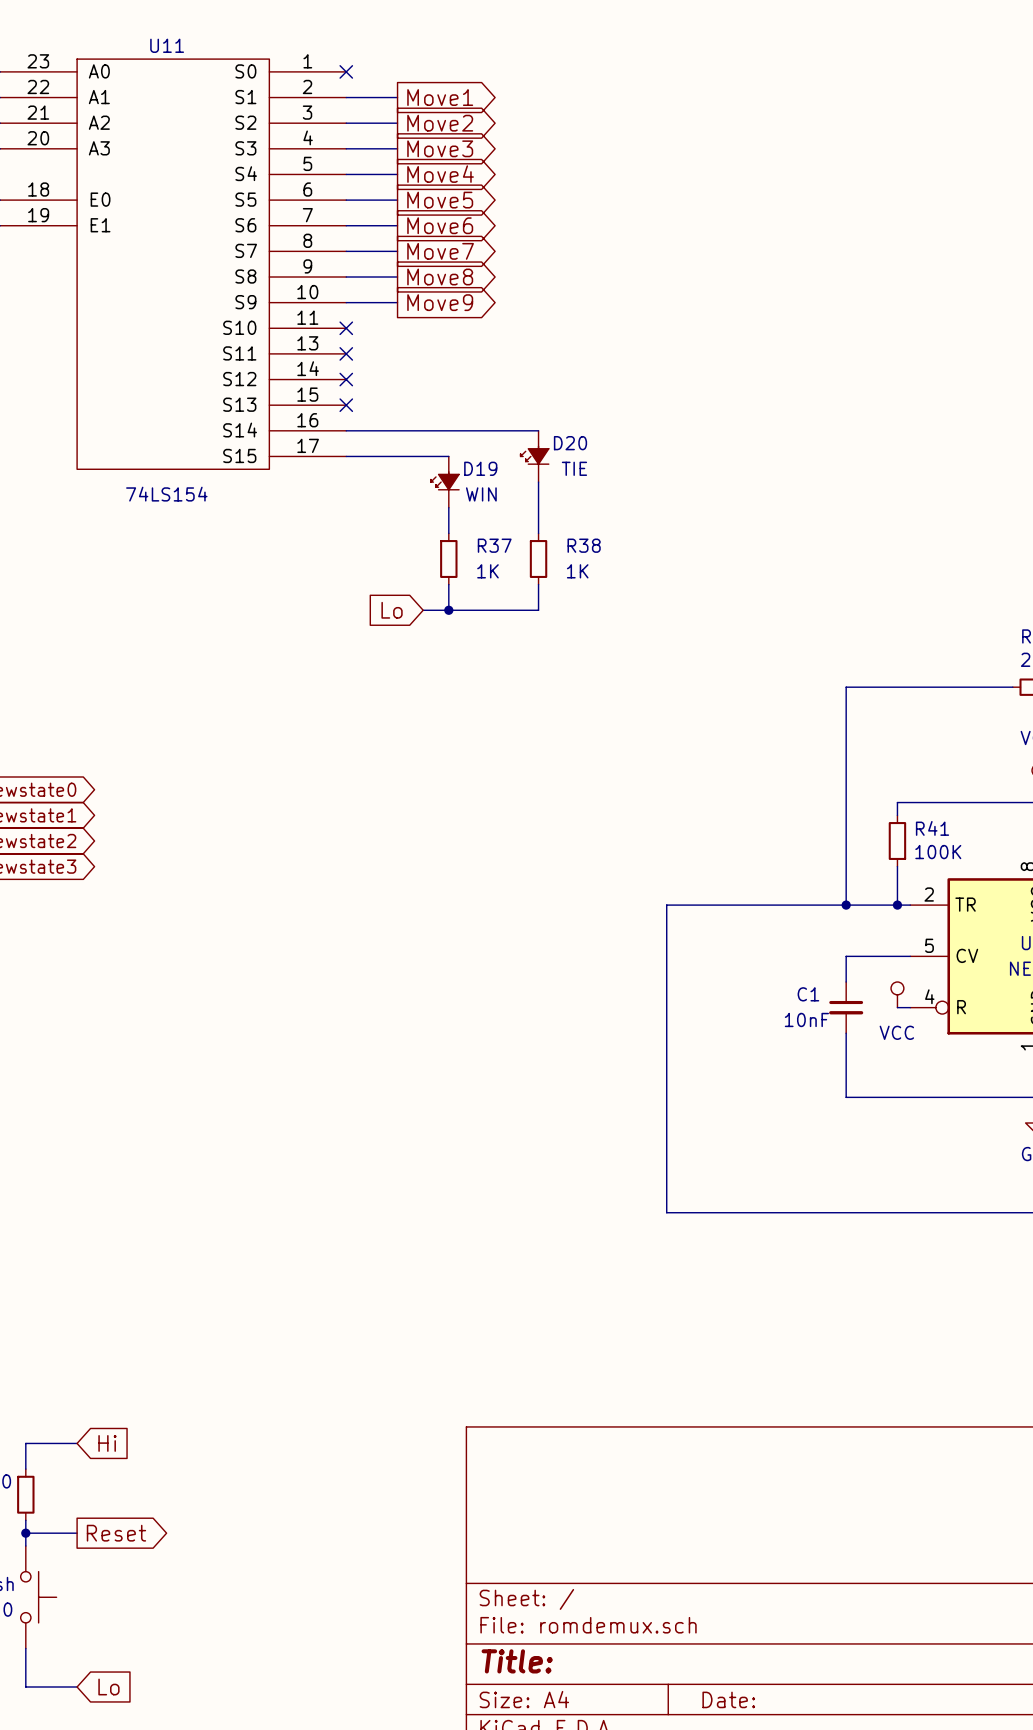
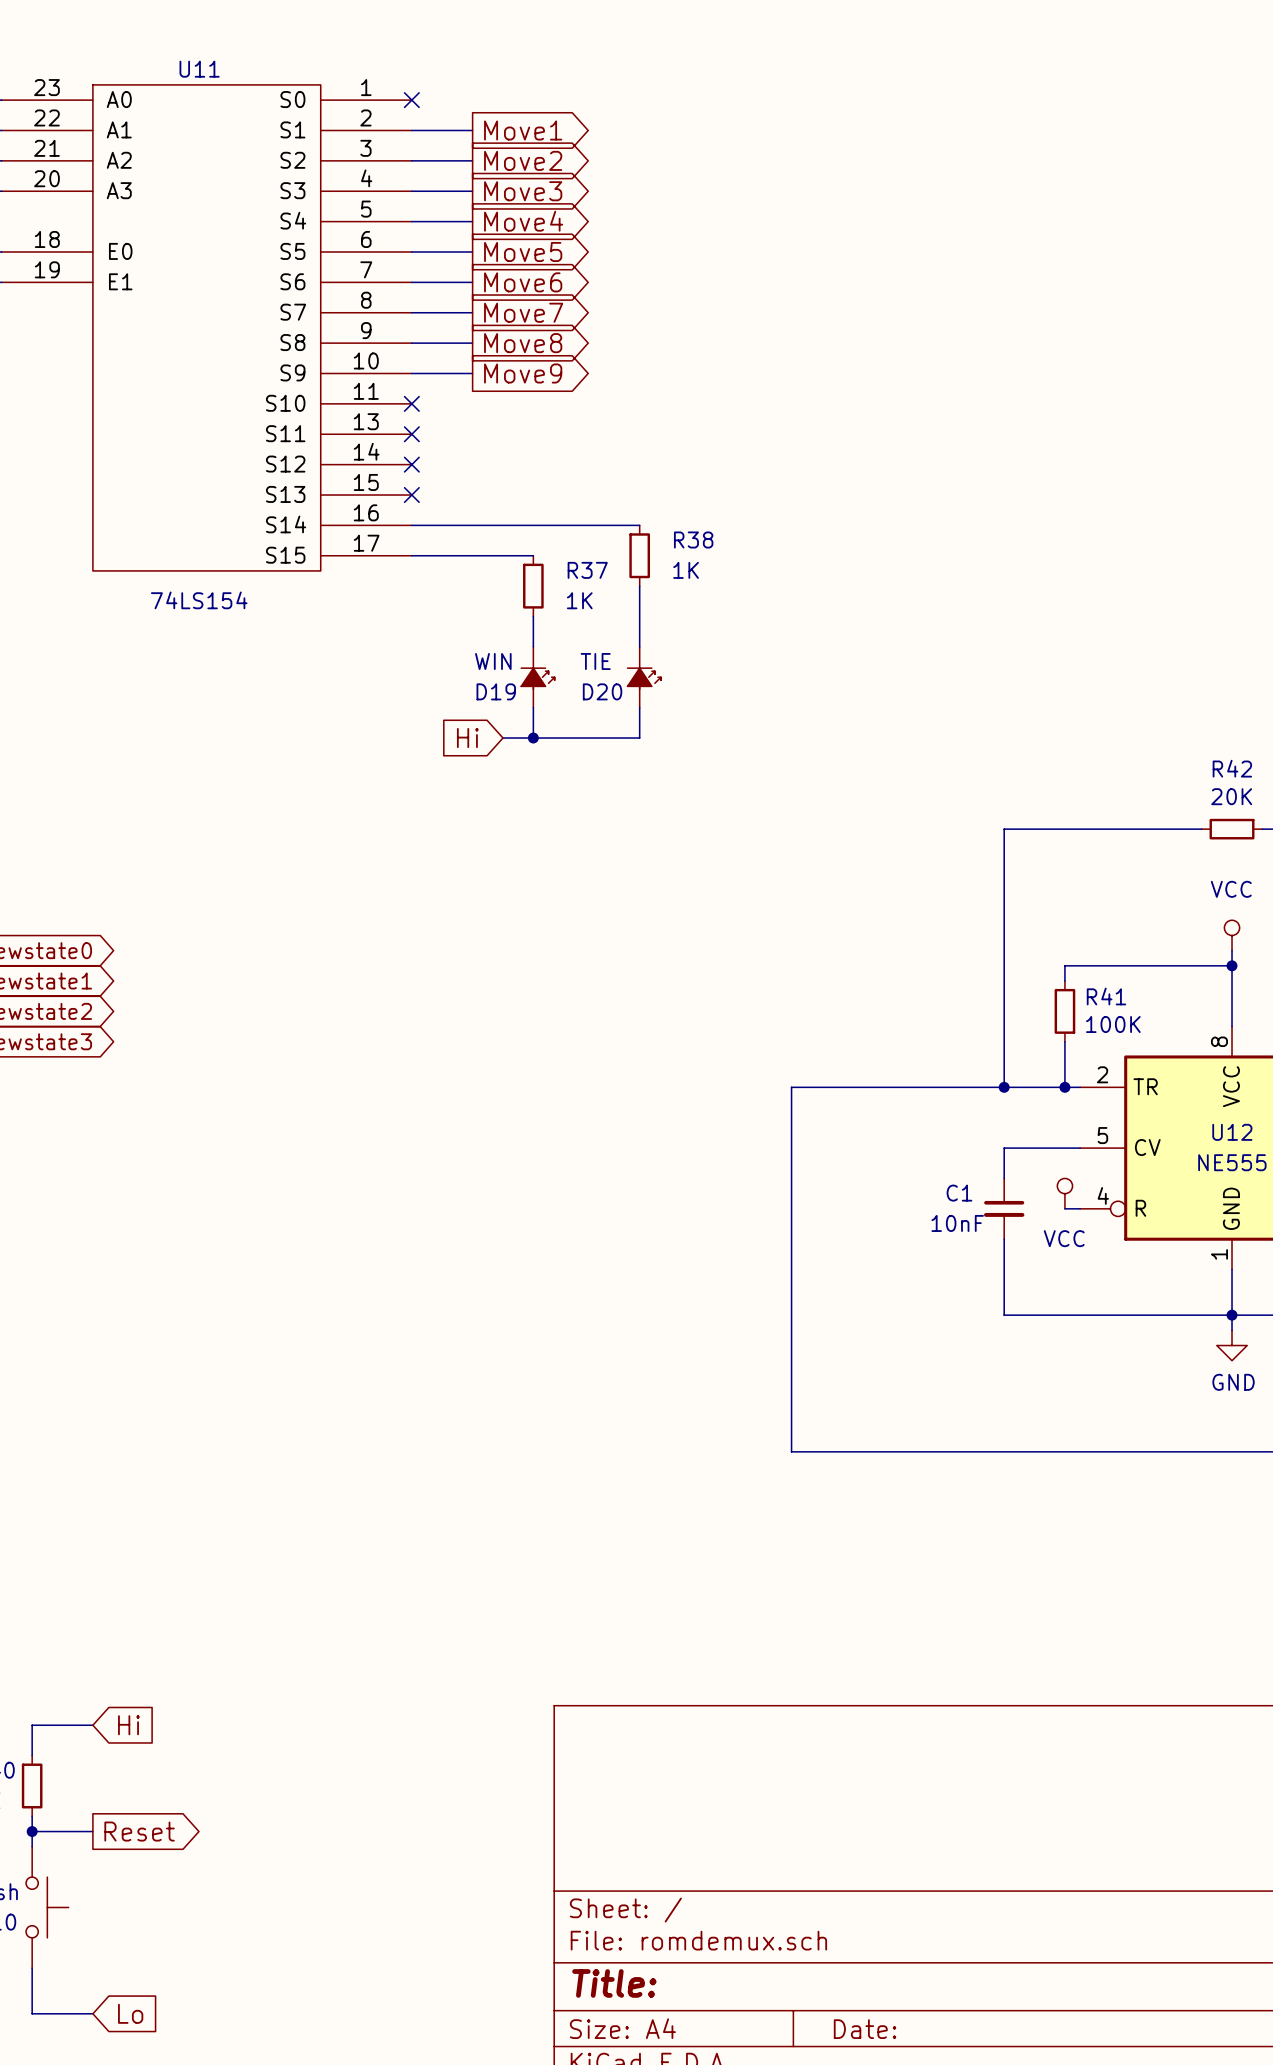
D20 rotation: 0° (534, 455) -> 180° (644, 678)
D20 position: (534, 456) -> (644, 677)
D19 rotation: 0° (444, 480) -> 180° (537, 678)
D19 position: (444, 482) -> (537, 677)
R37 position: (448, 559) -> (533, 586)
R38 position: (538, 559) -> (639, 555)
global label: Lo (392, 610) -> Hi (467, 738)

